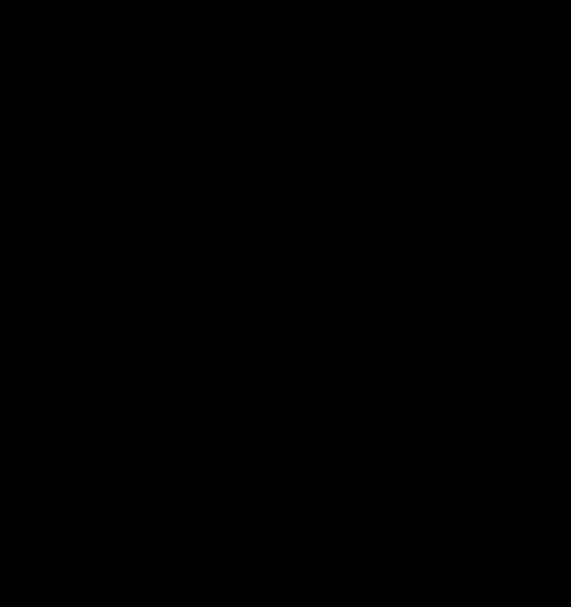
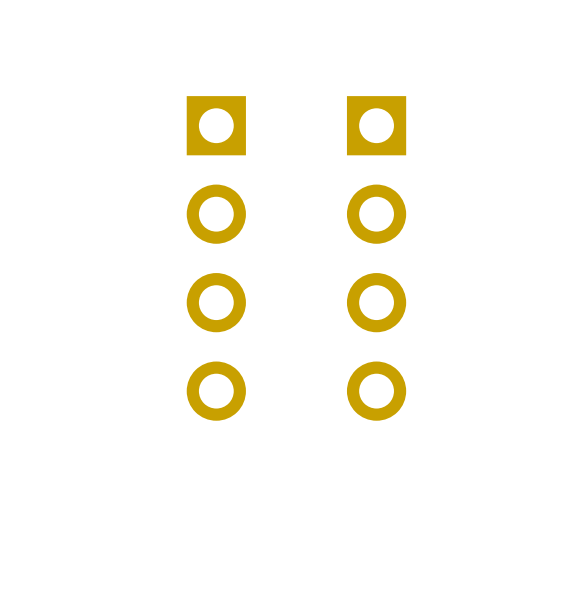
part: none -> (216, 258)
part: none -> (376, 258)

